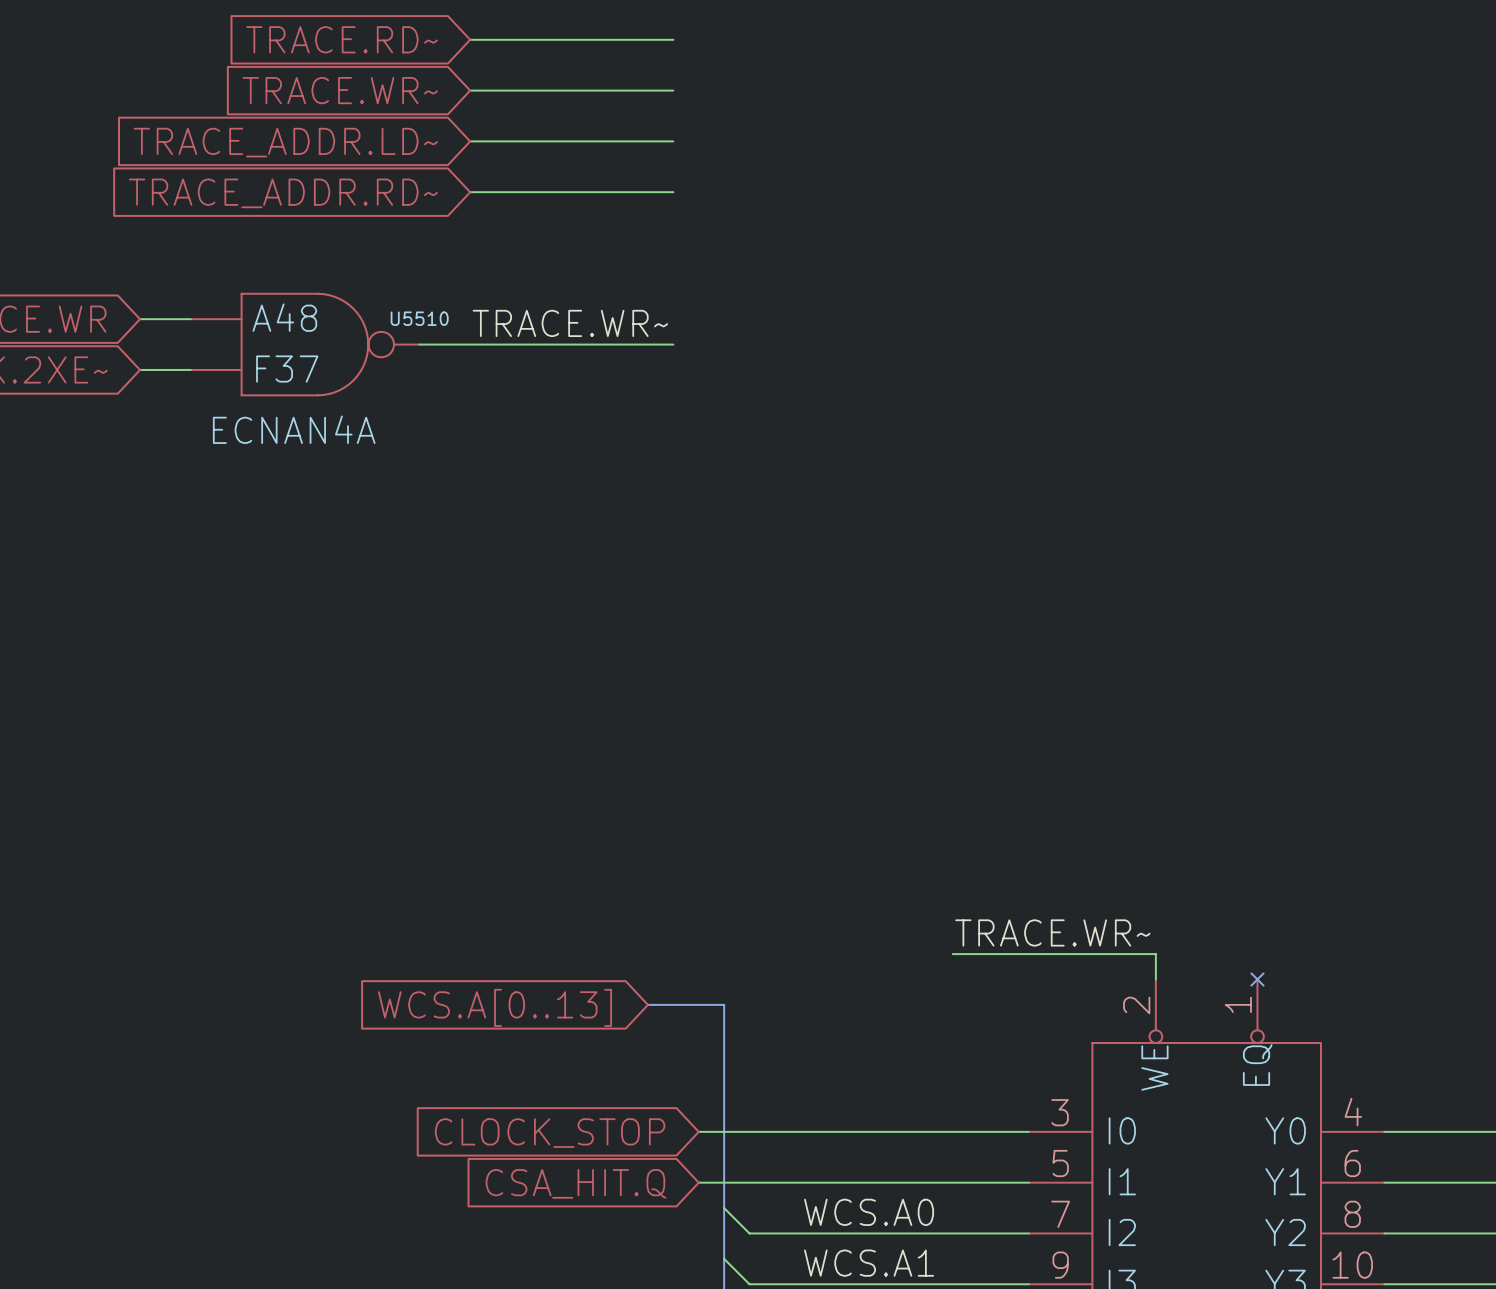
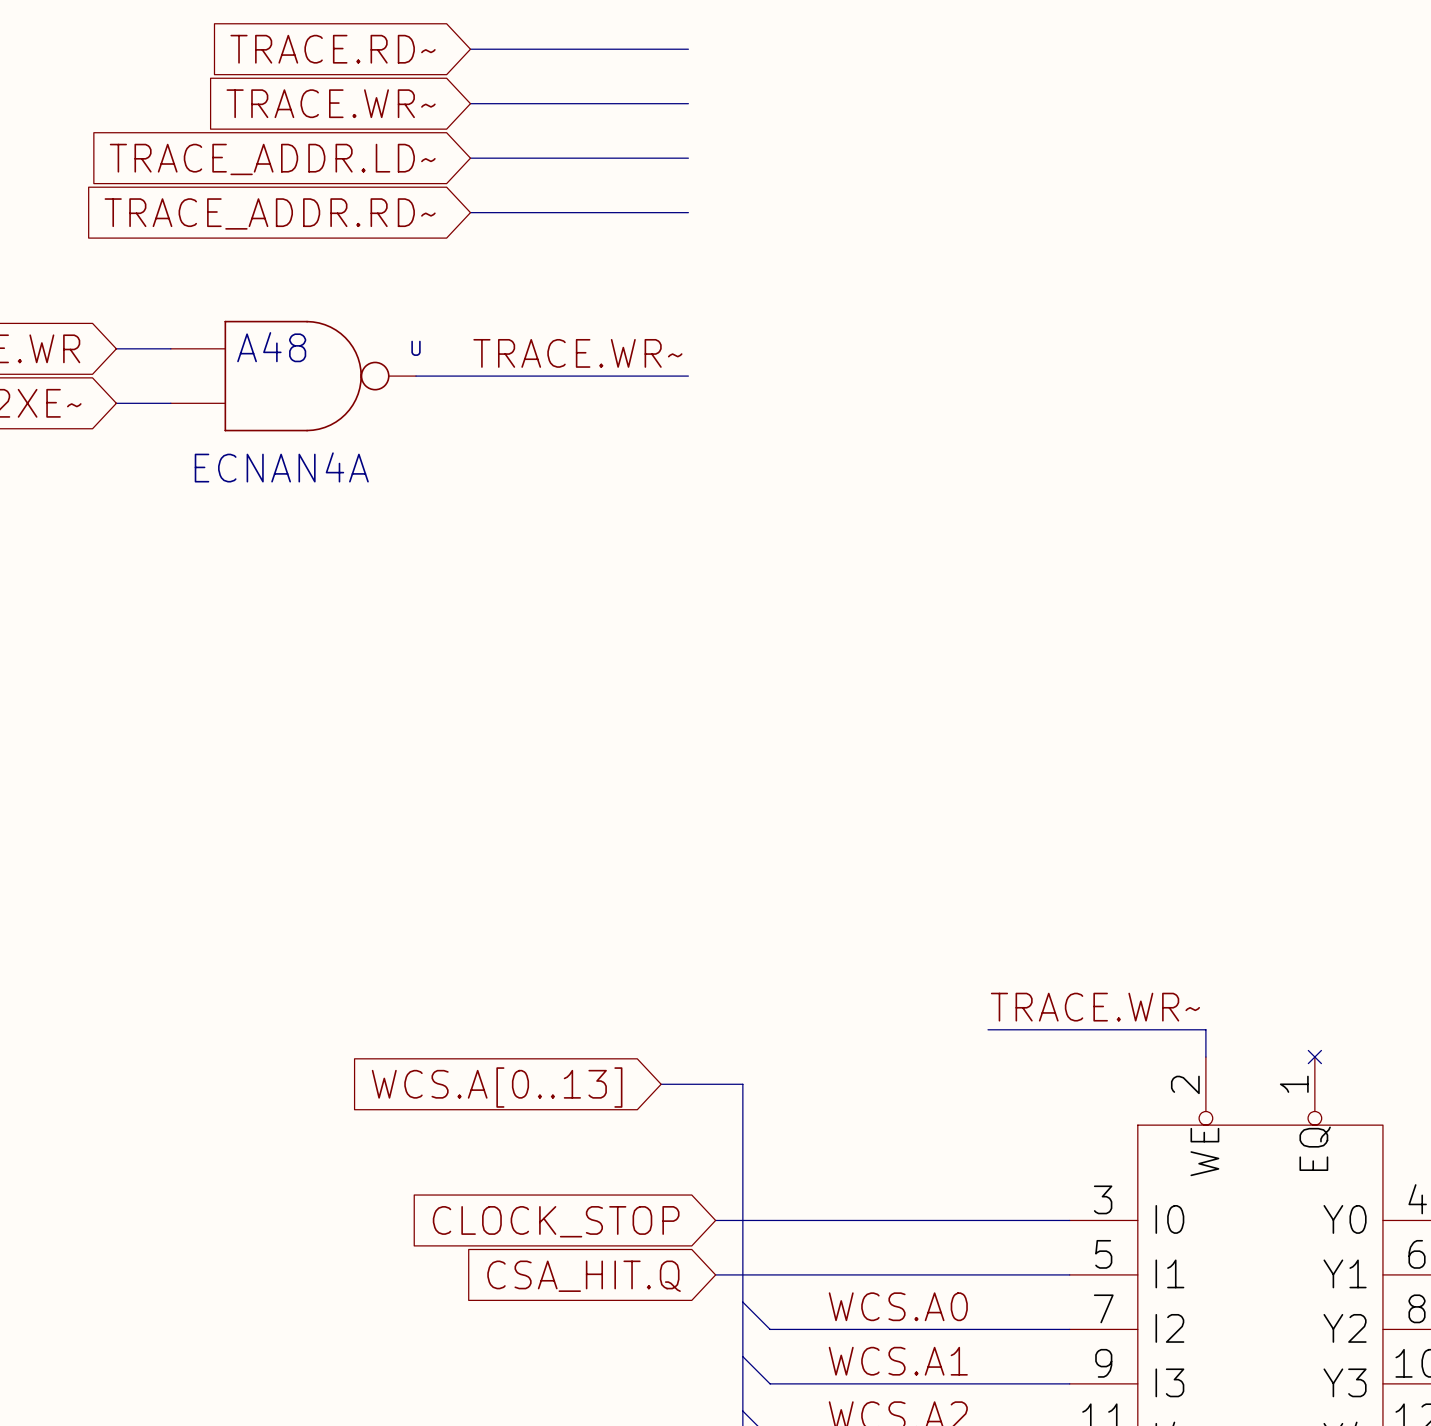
U5510 name: U5510 (419, 318) -> U (416, 348)
U5510 value: F37 (287, 369) -> none

